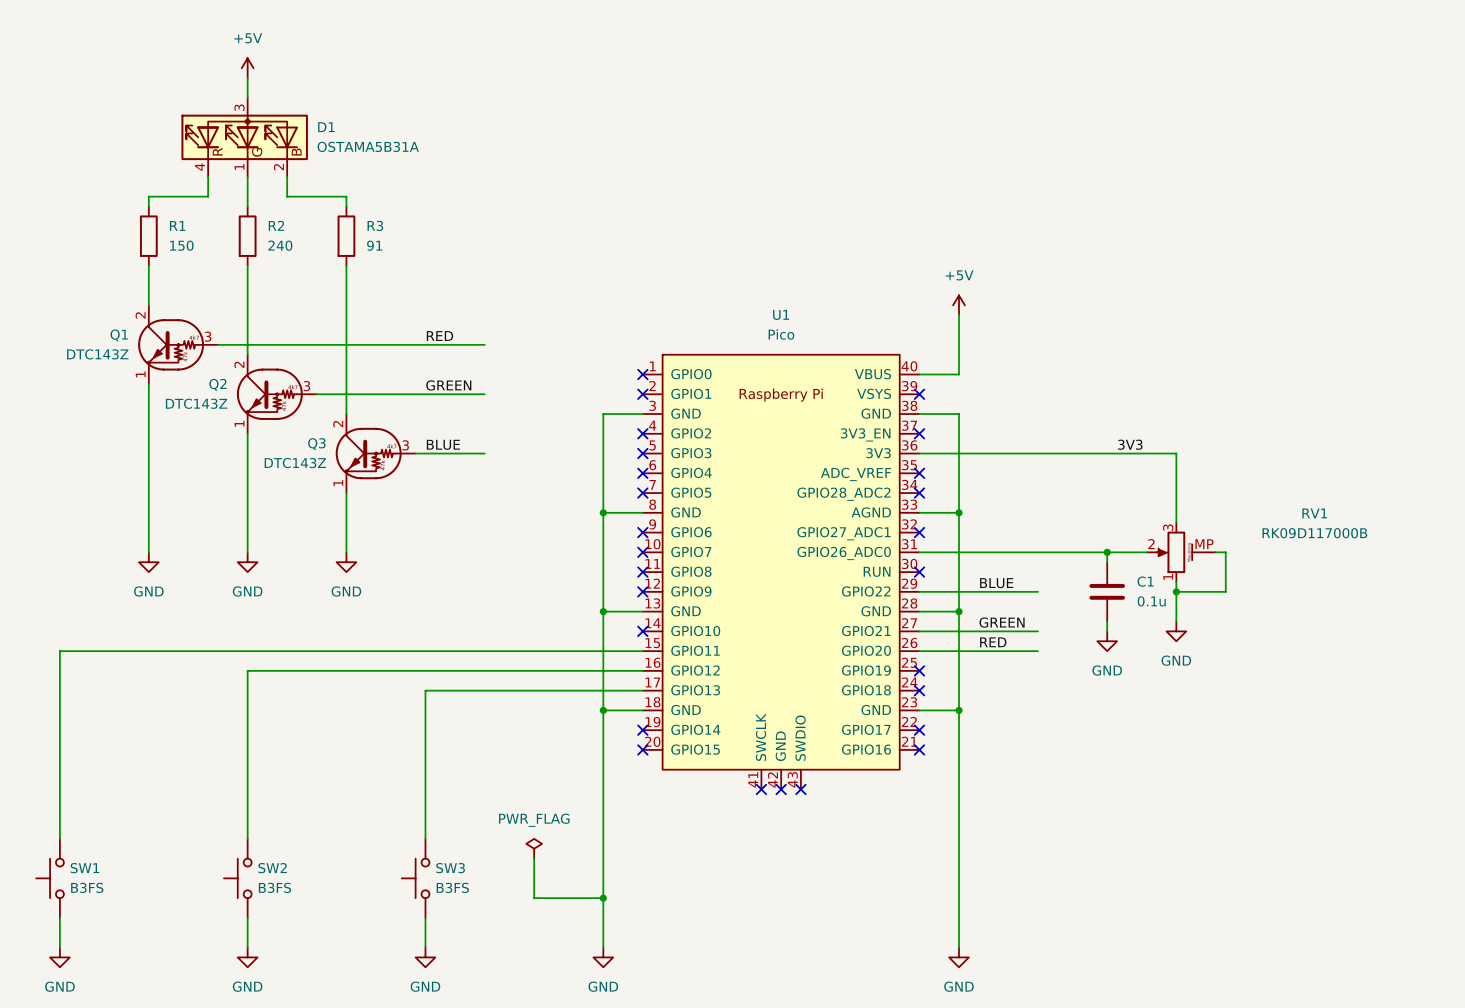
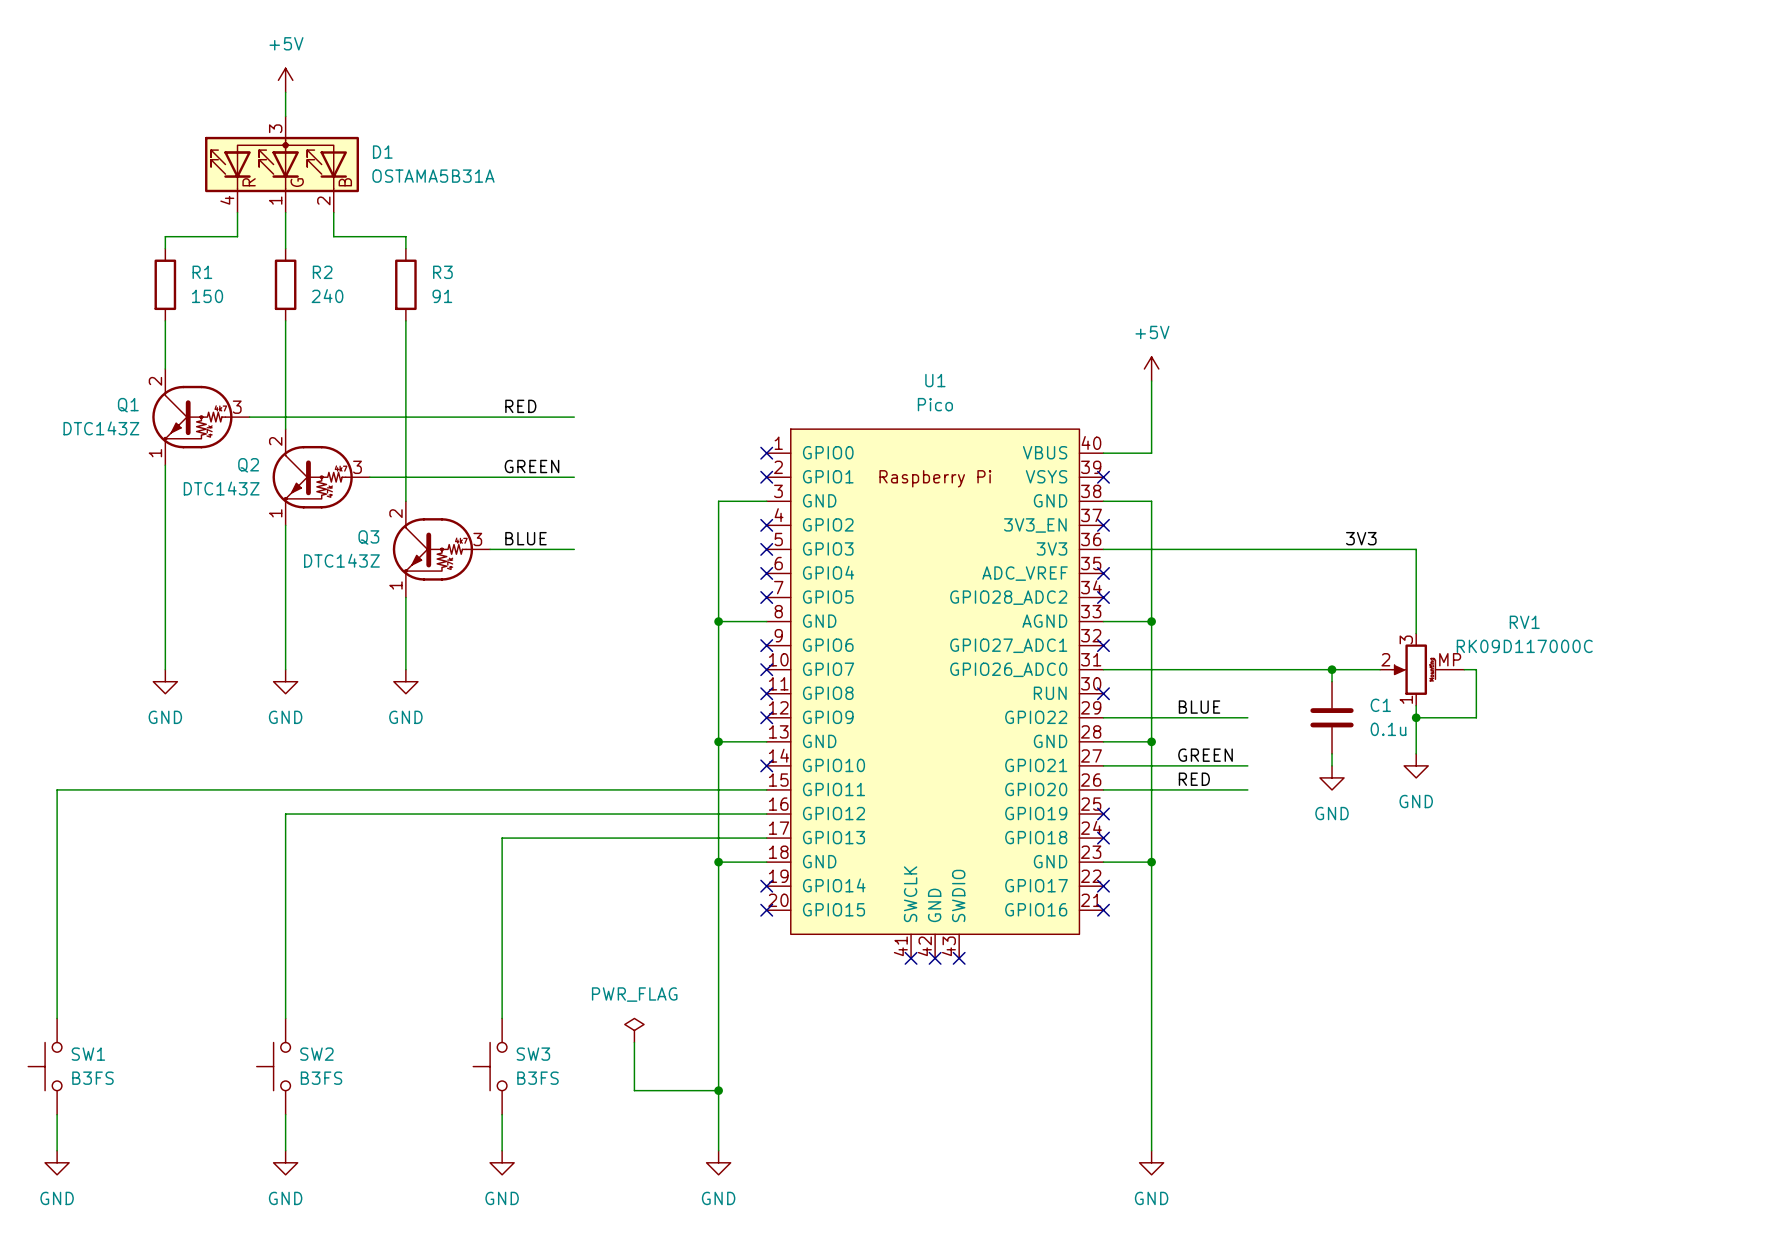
RV1 name position: RV1 (1314, 513) -> RV1 (1524, 622)
RV1 value: RK09D117000B (1314, 533) -> RK09D117000C (1524, 646)

